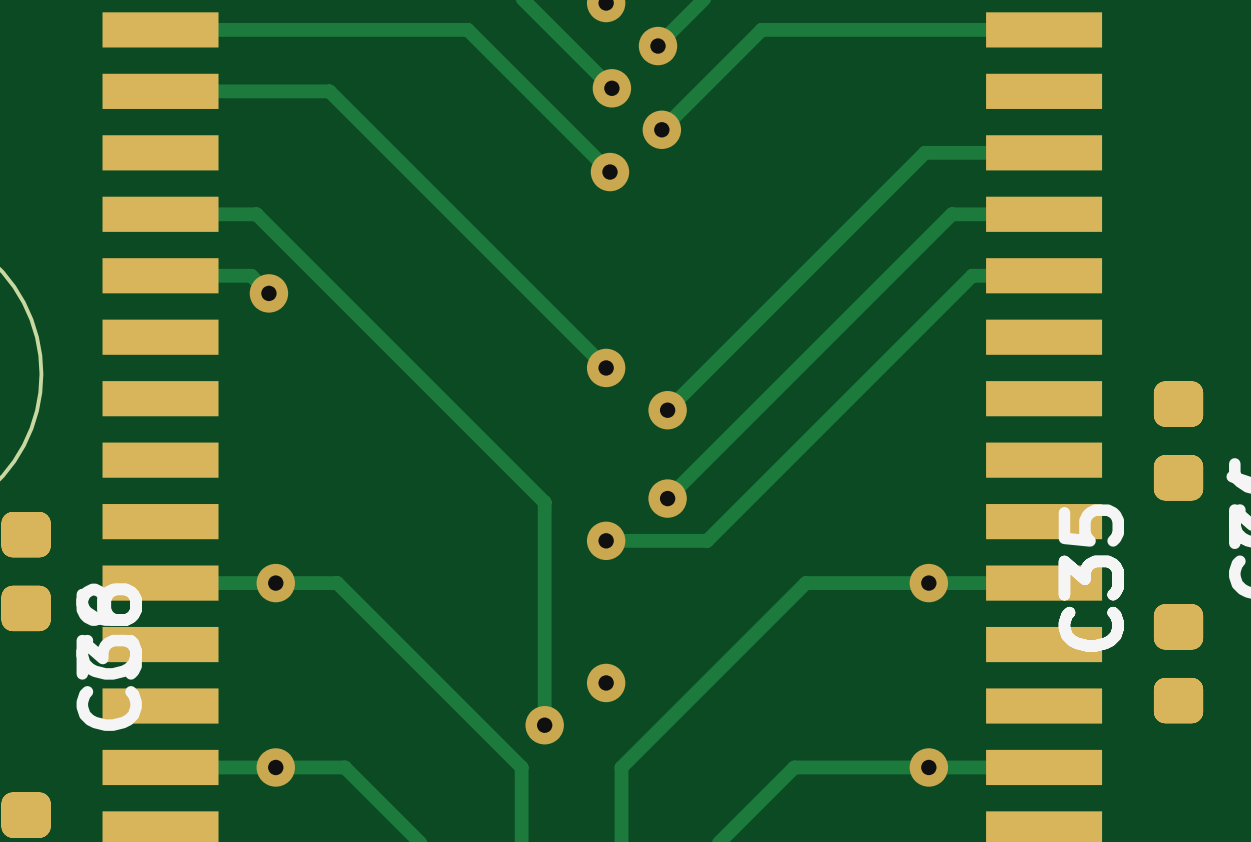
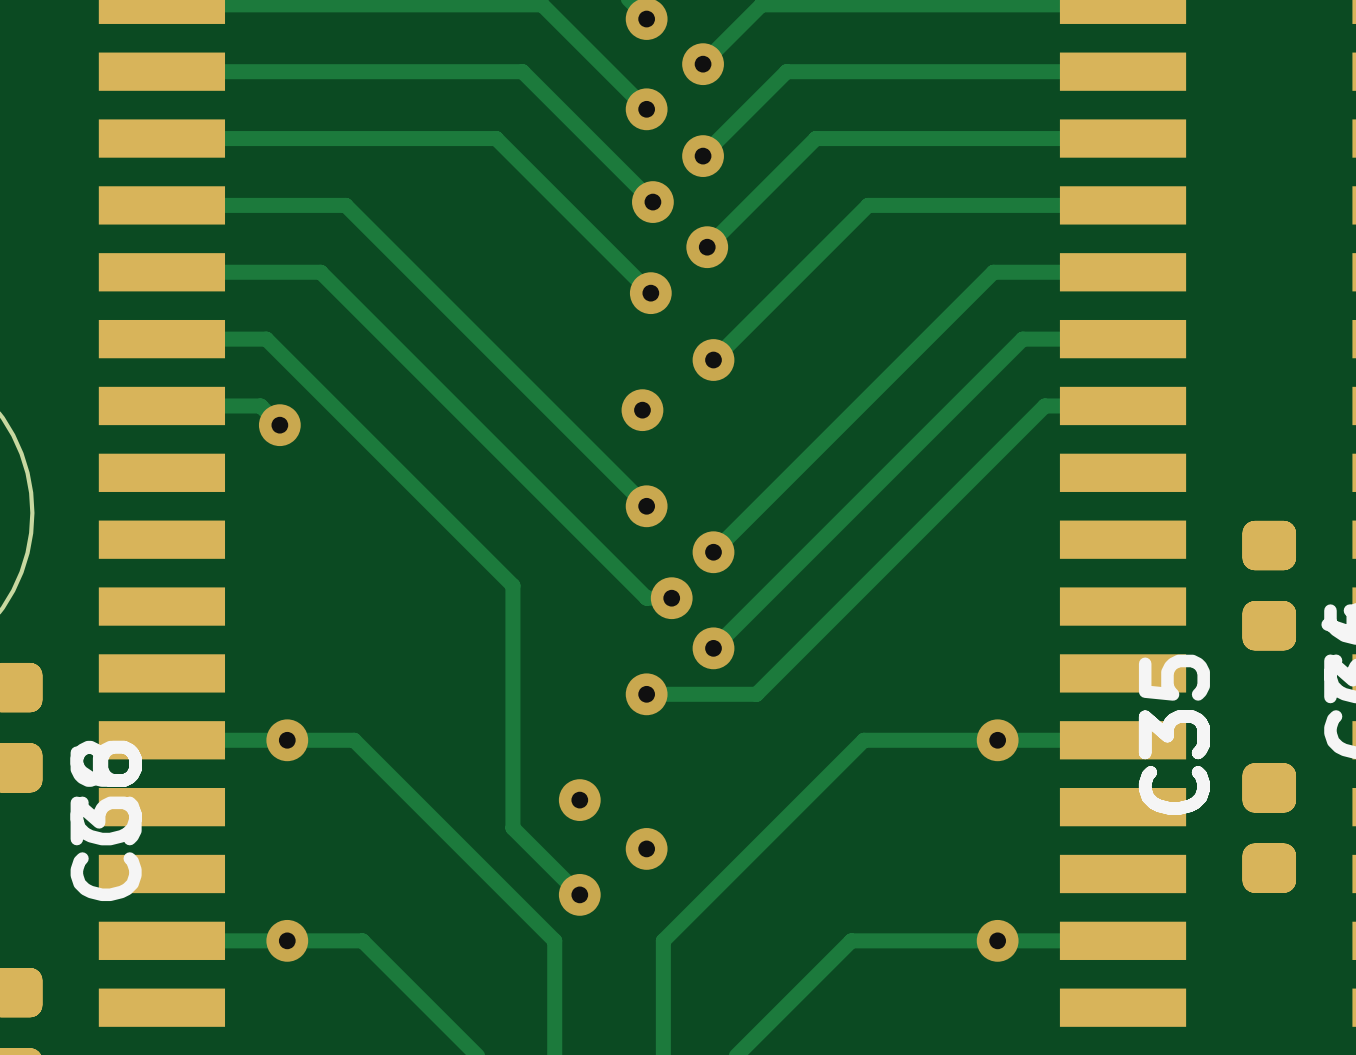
track: none -> (1123, 205) (868, 205) (713, 360)
track: none -> (161, 272) (320, 272) (646, 598) (671, 598)
via: none -> (713, 360)
via: none -> (642, 410)
track: (483, 440) (544, 502) (544, 725) -> (512, 585) (512, 828) (579, 894)
via: none -> (671, 598)
via: none -> (579, 800)

